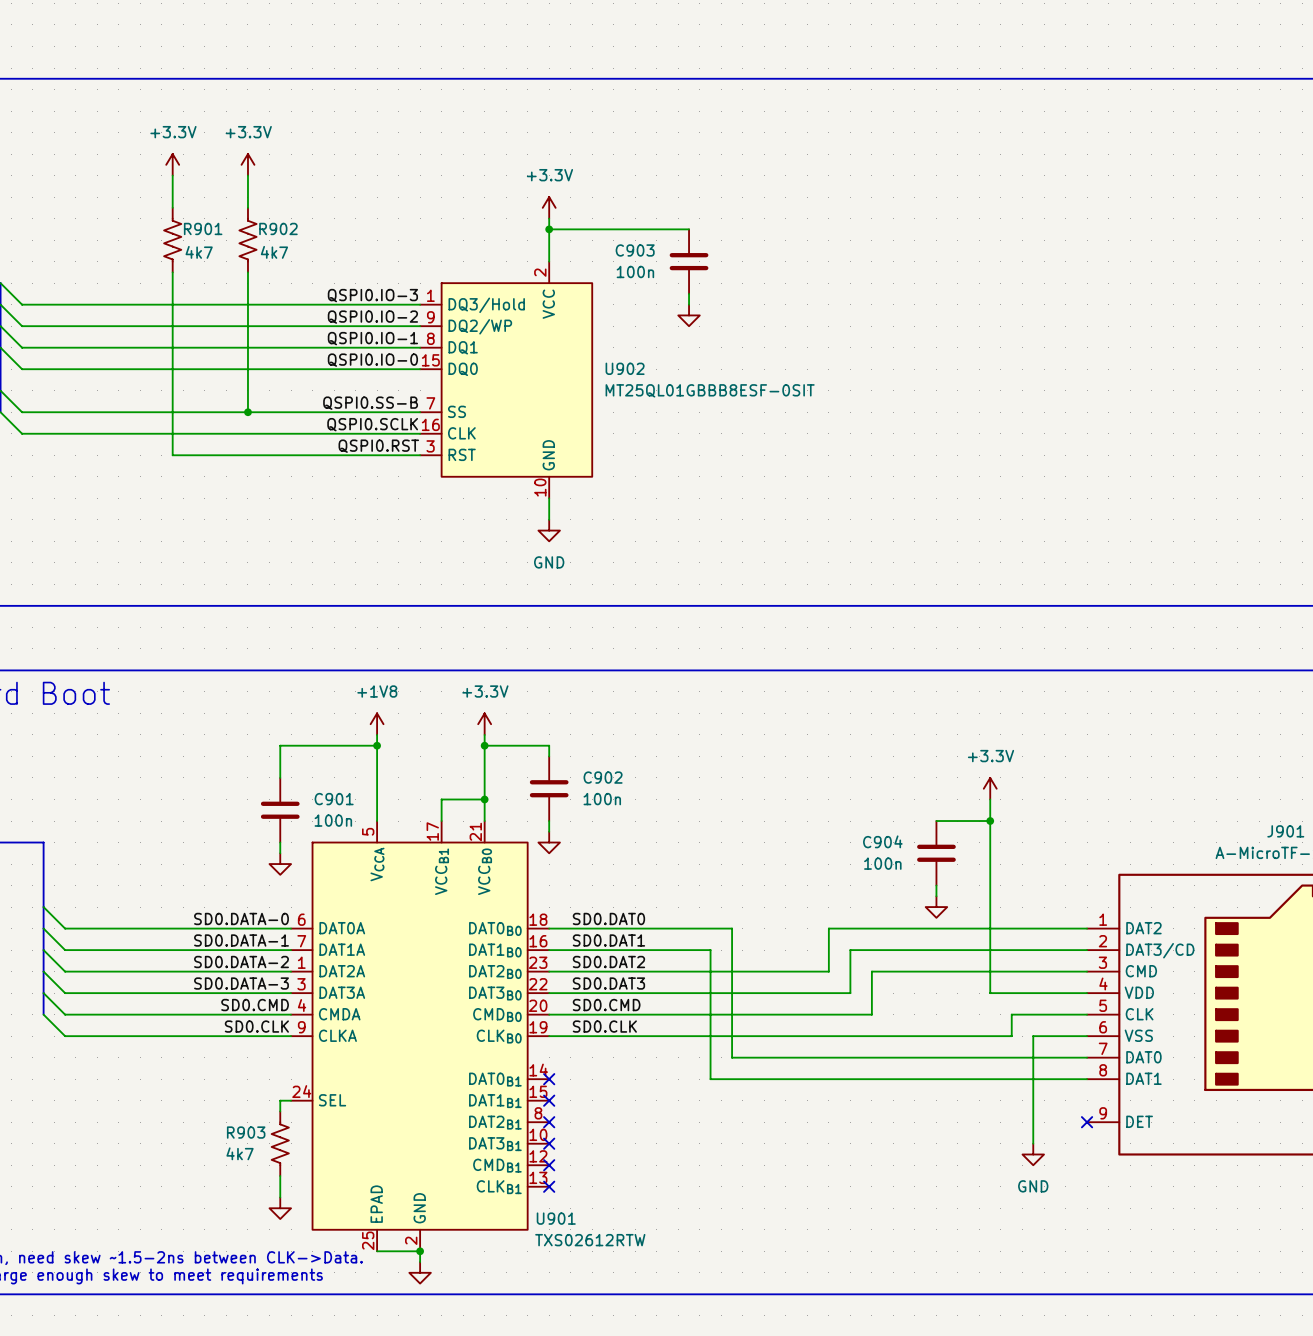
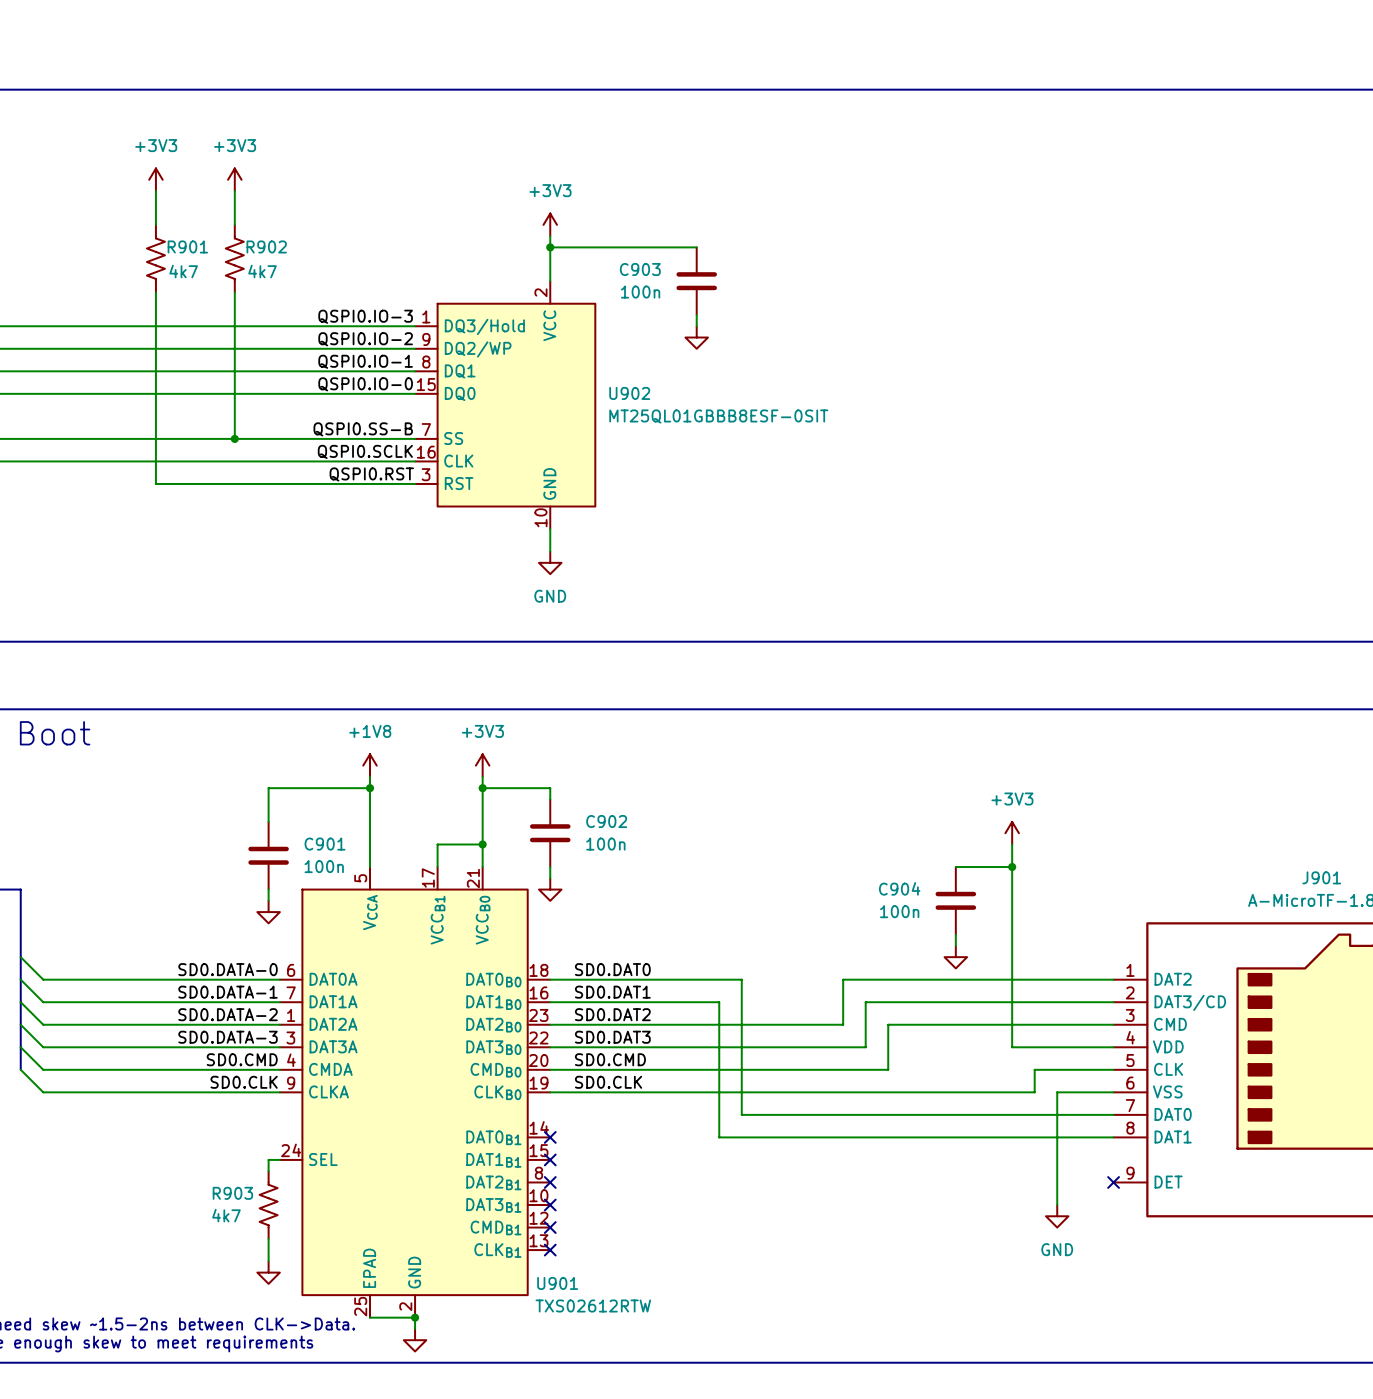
power symbol: +3.3V (172, 164) -> +3V3 (155, 179)
power symbol: +3.3V (247, 164) -> +3V3 (234, 179)
power symbol: +3.3V (549, 207) -> +3V3 (550, 224)
power symbol: +3.3V (484, 724) -> +3V3 (482, 765)
power symbol: +3.3V (990, 788) -> +3V3 (1012, 833)

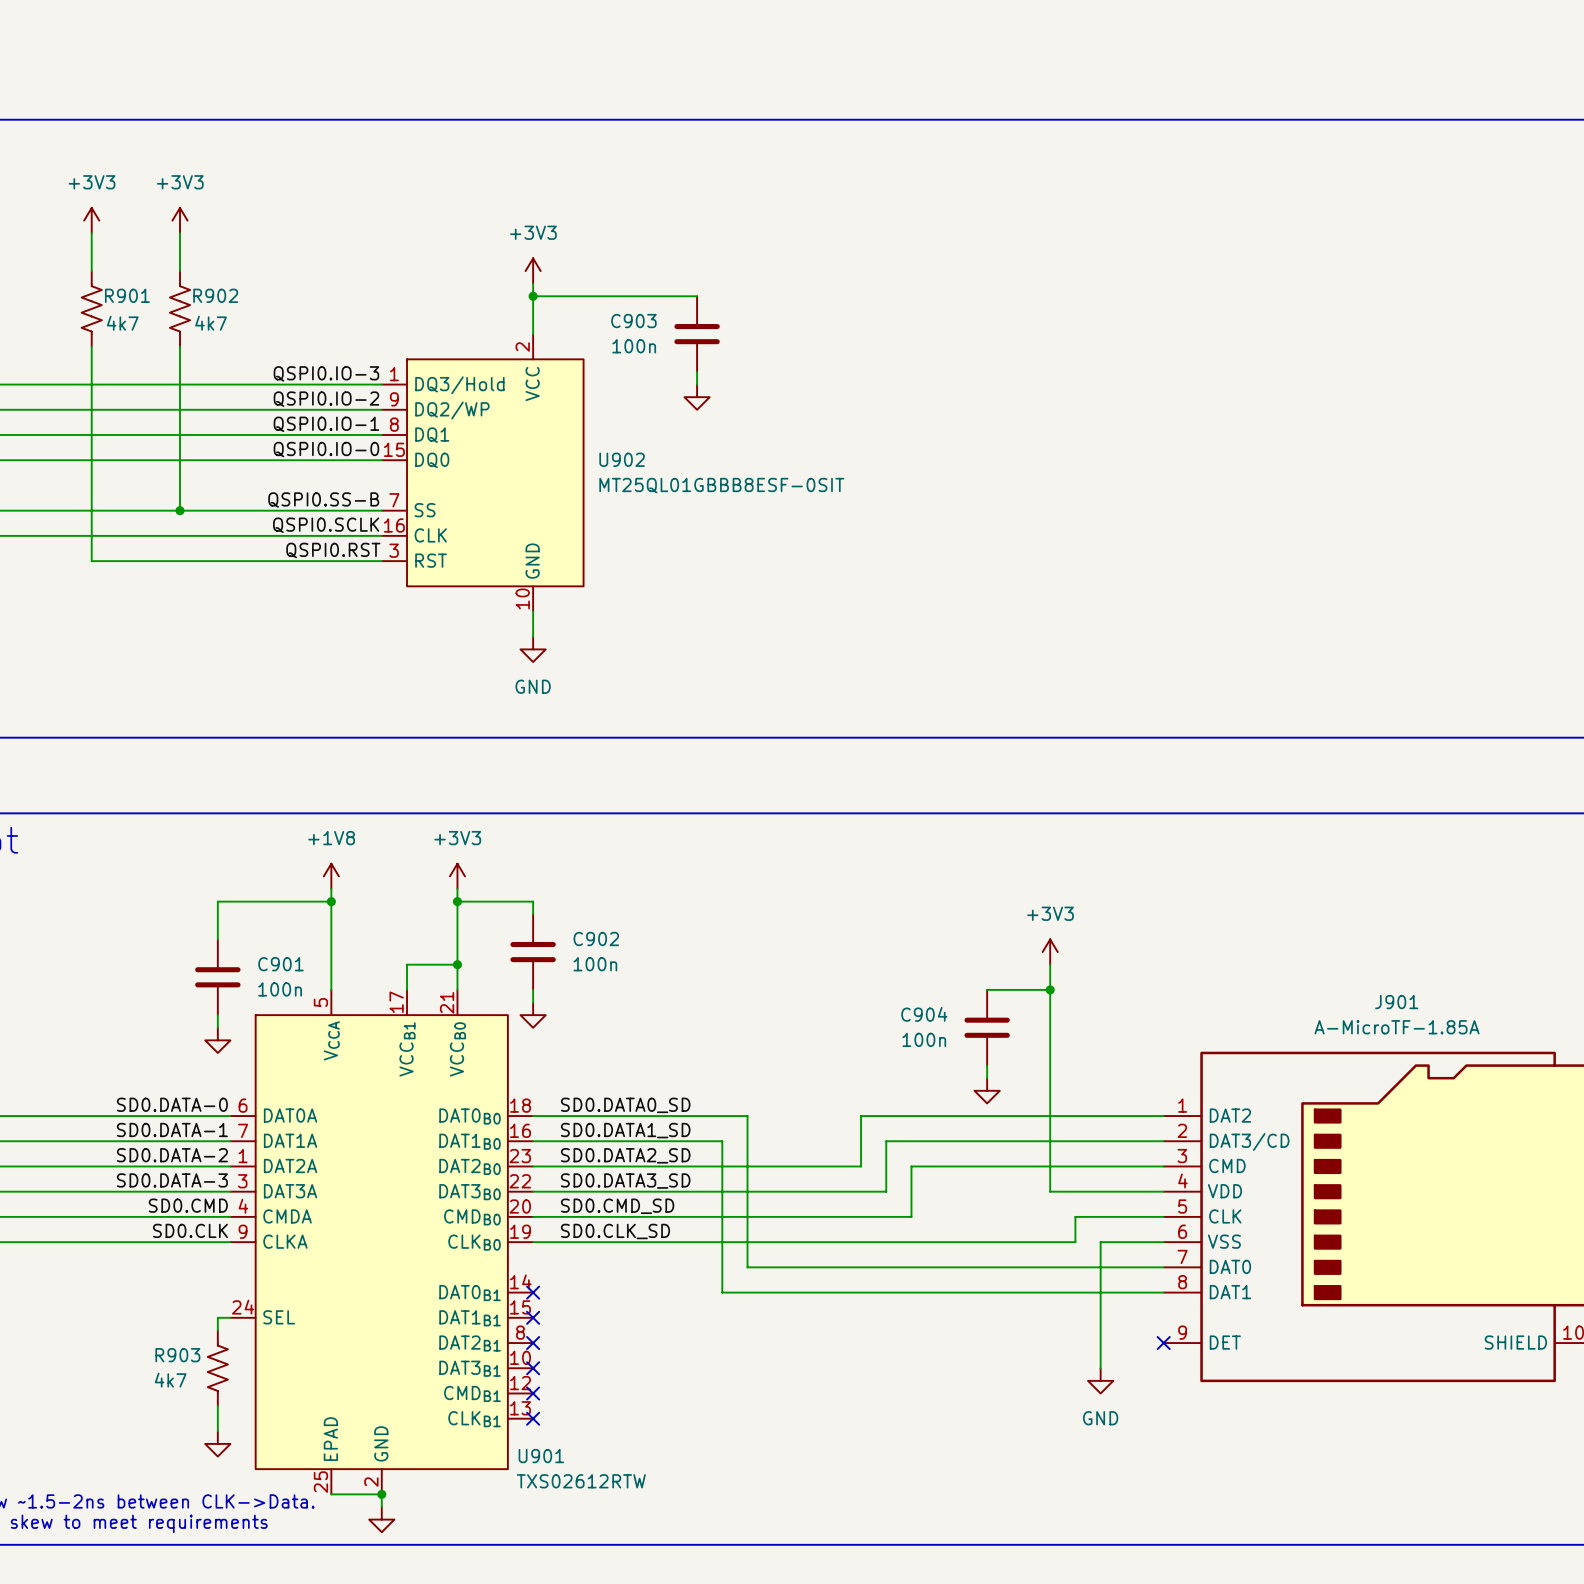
label: SD0.DAT0 (612, 969) -> SD0.DATA0_SD (625, 1105)
label: SD0.DAT1 (612, 992) -> SD0.DATA1_SD (625, 1130)
label: SD0.DAT2 (612, 1014) -> SD0.DATA2_SD (625, 1155)
label: SD0.DAT3 (612, 1037) -> SD0.DATA3_SD (625, 1181)
label: SD0.CMD (610, 1059) -> SD0.CMD_SD (617, 1206)
label: SD0.CLK (608, 1082) -> SD0.CLK_SD (615, 1231)

